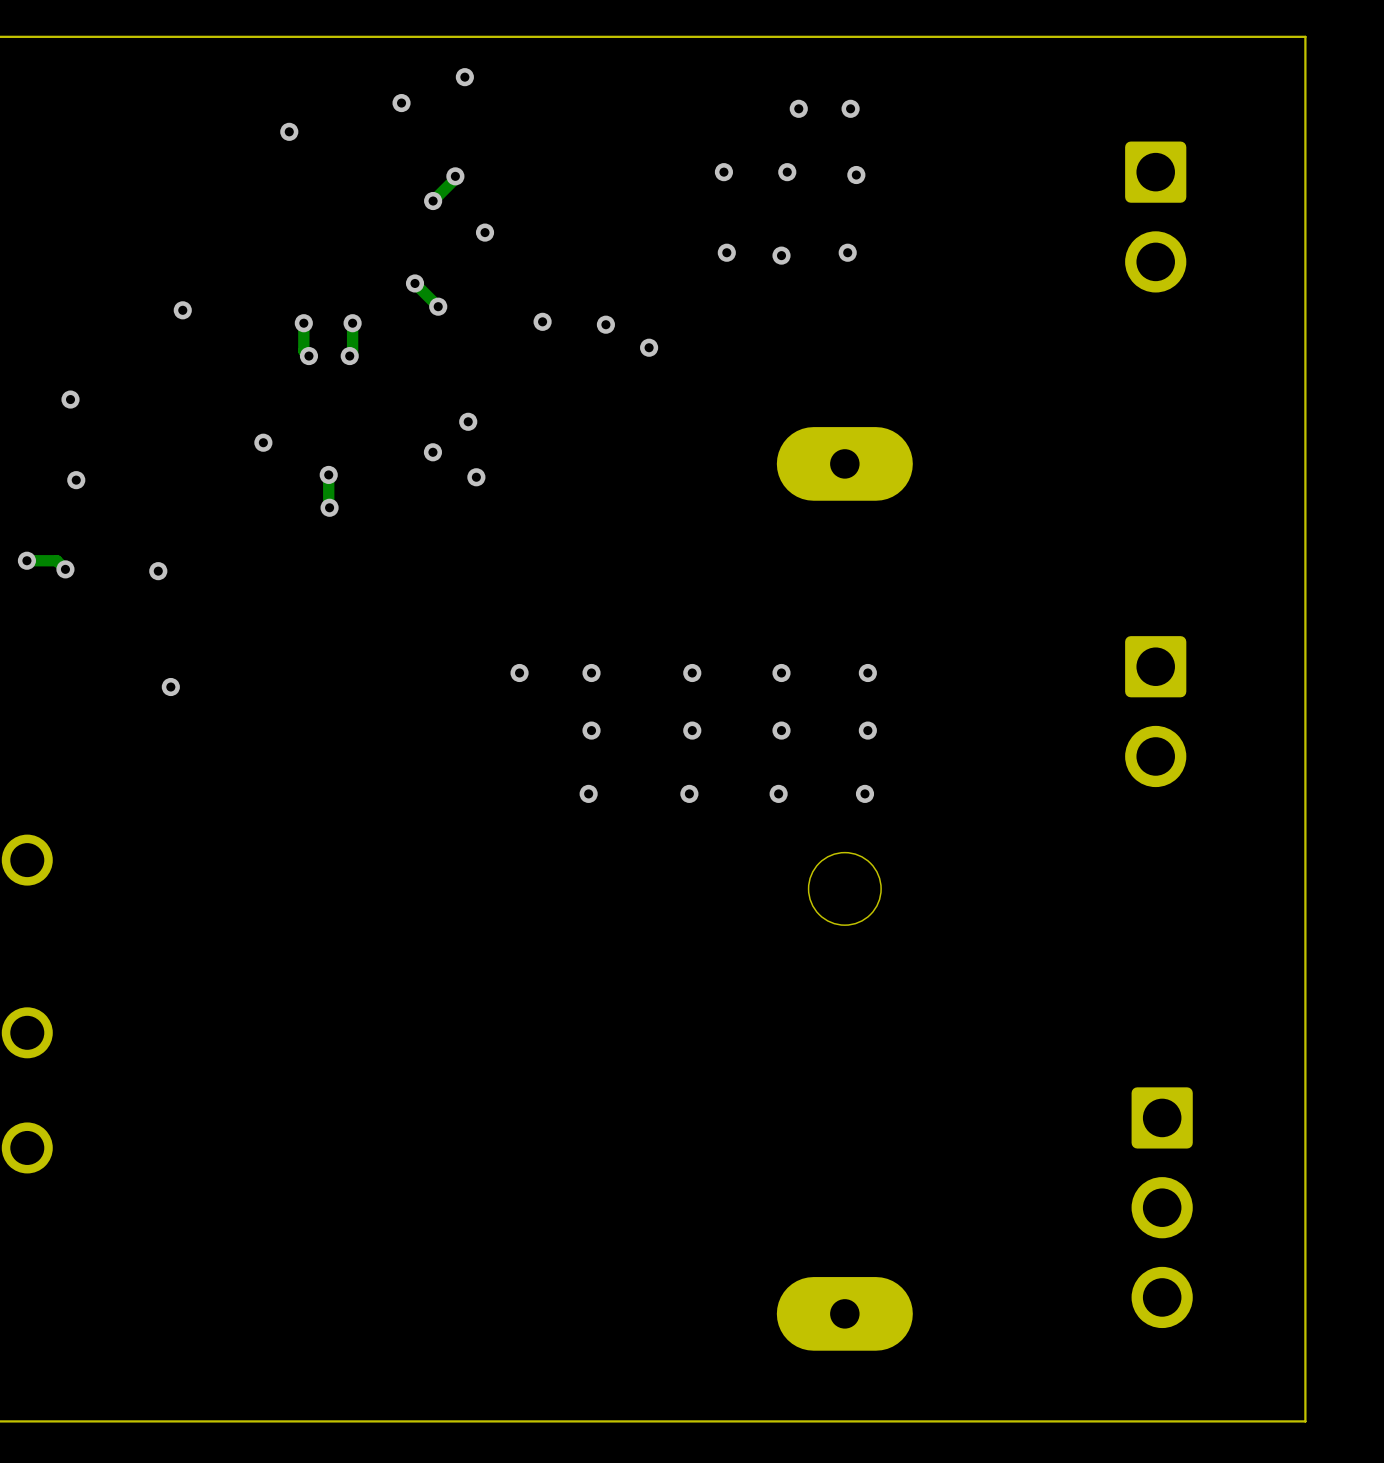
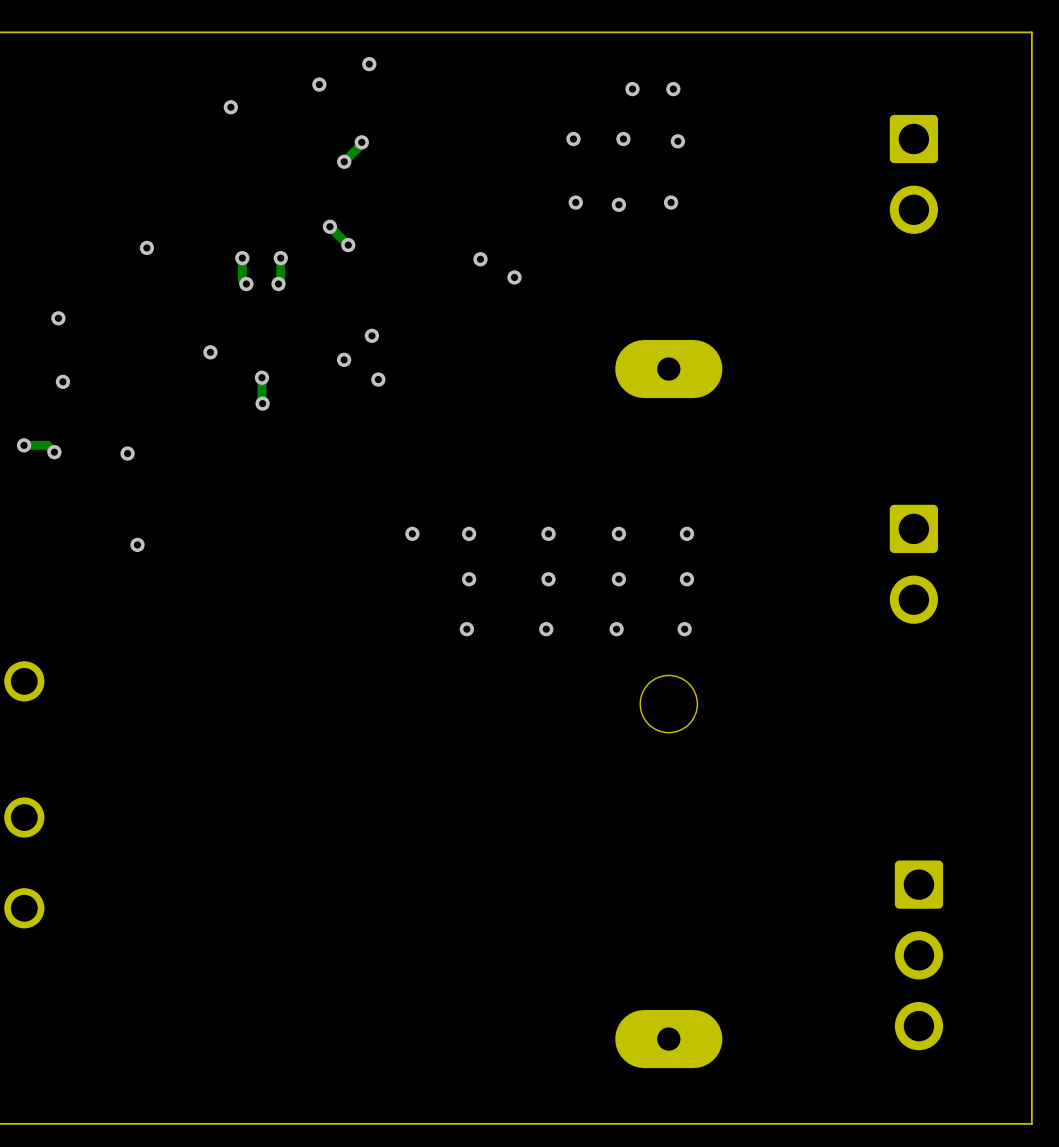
via: (485, 232) -> none
via: (542, 321) -> none

